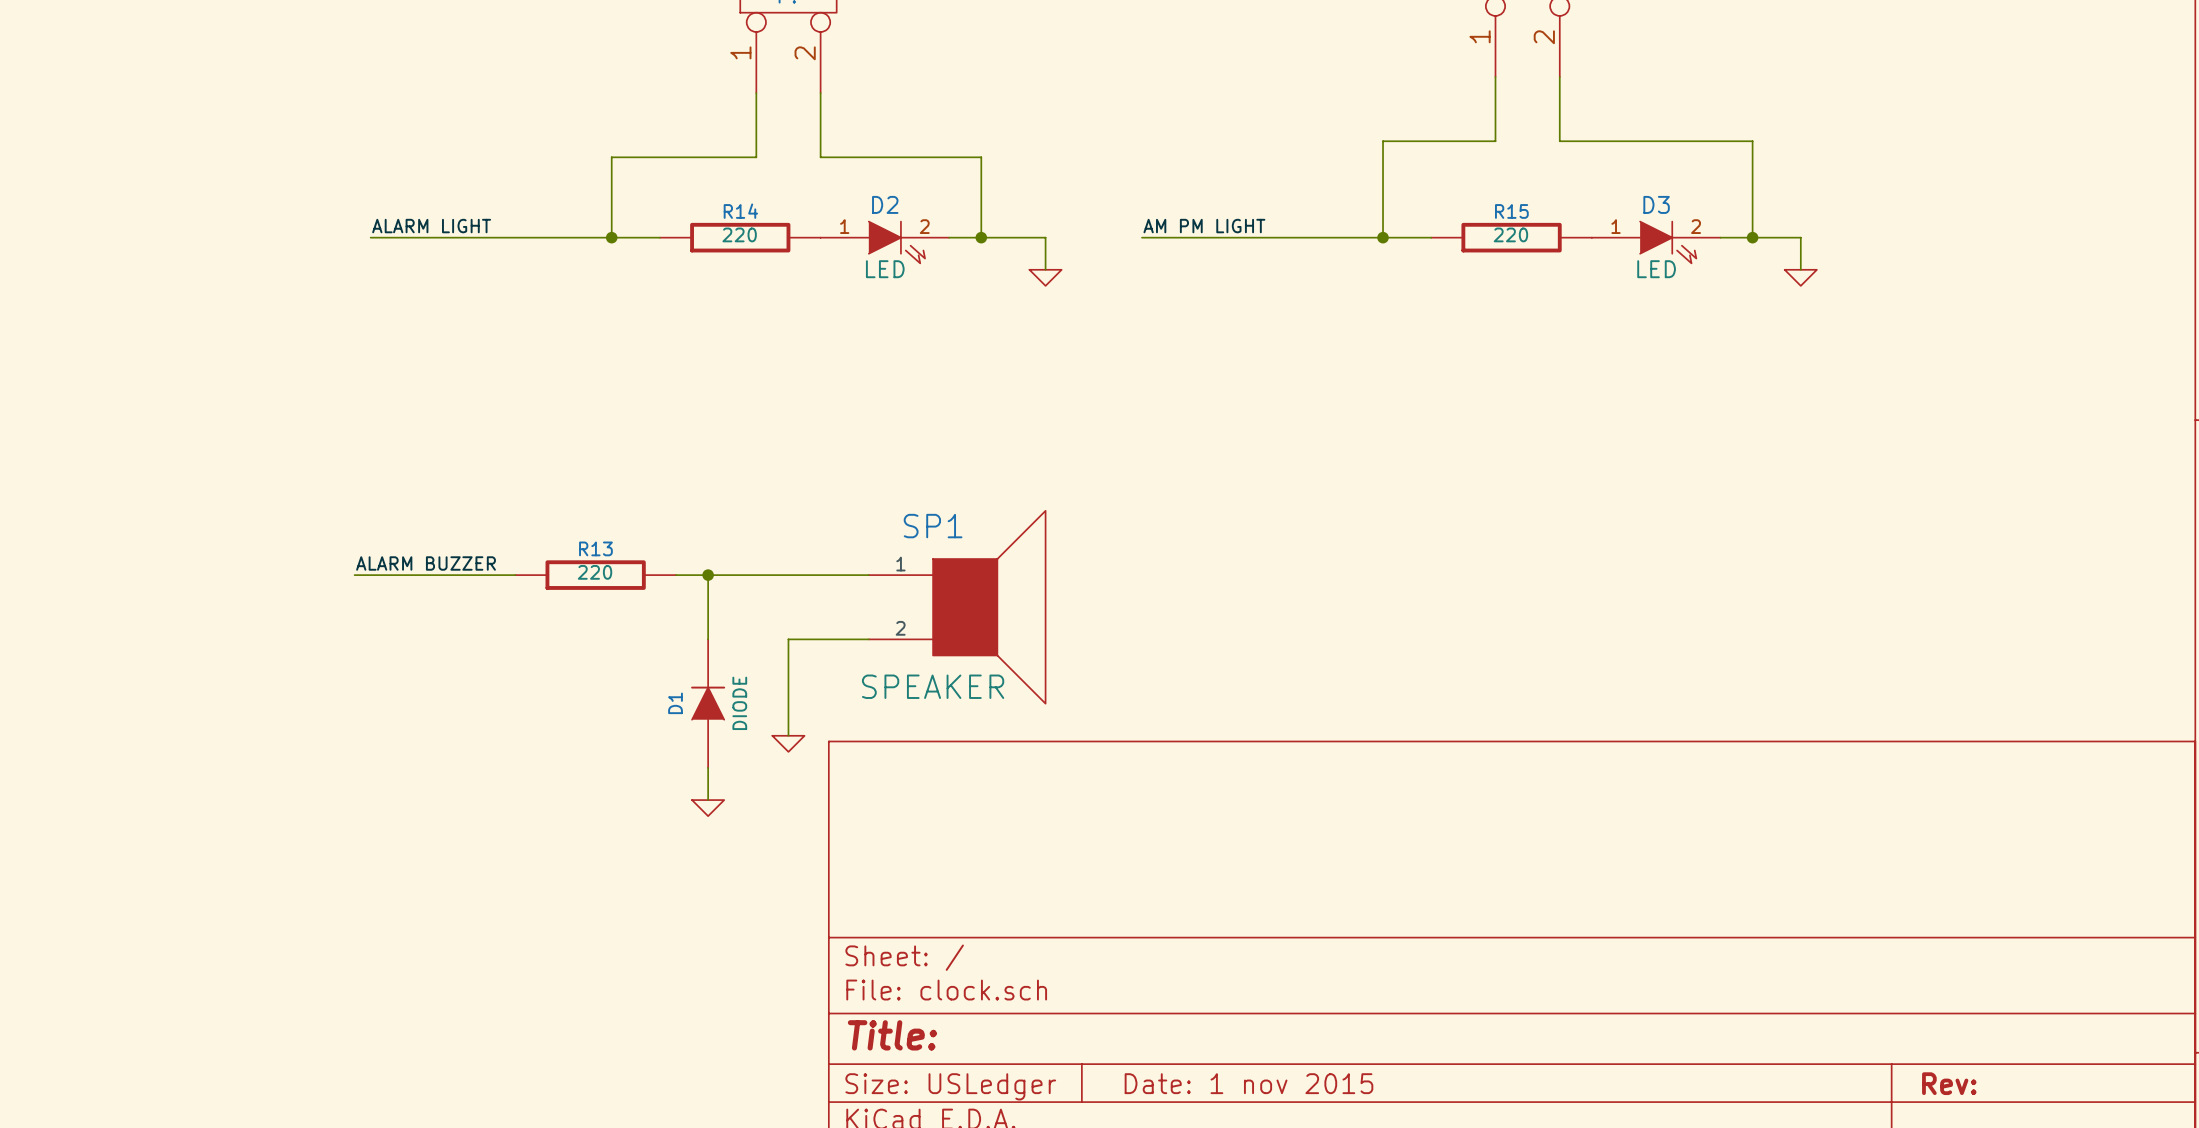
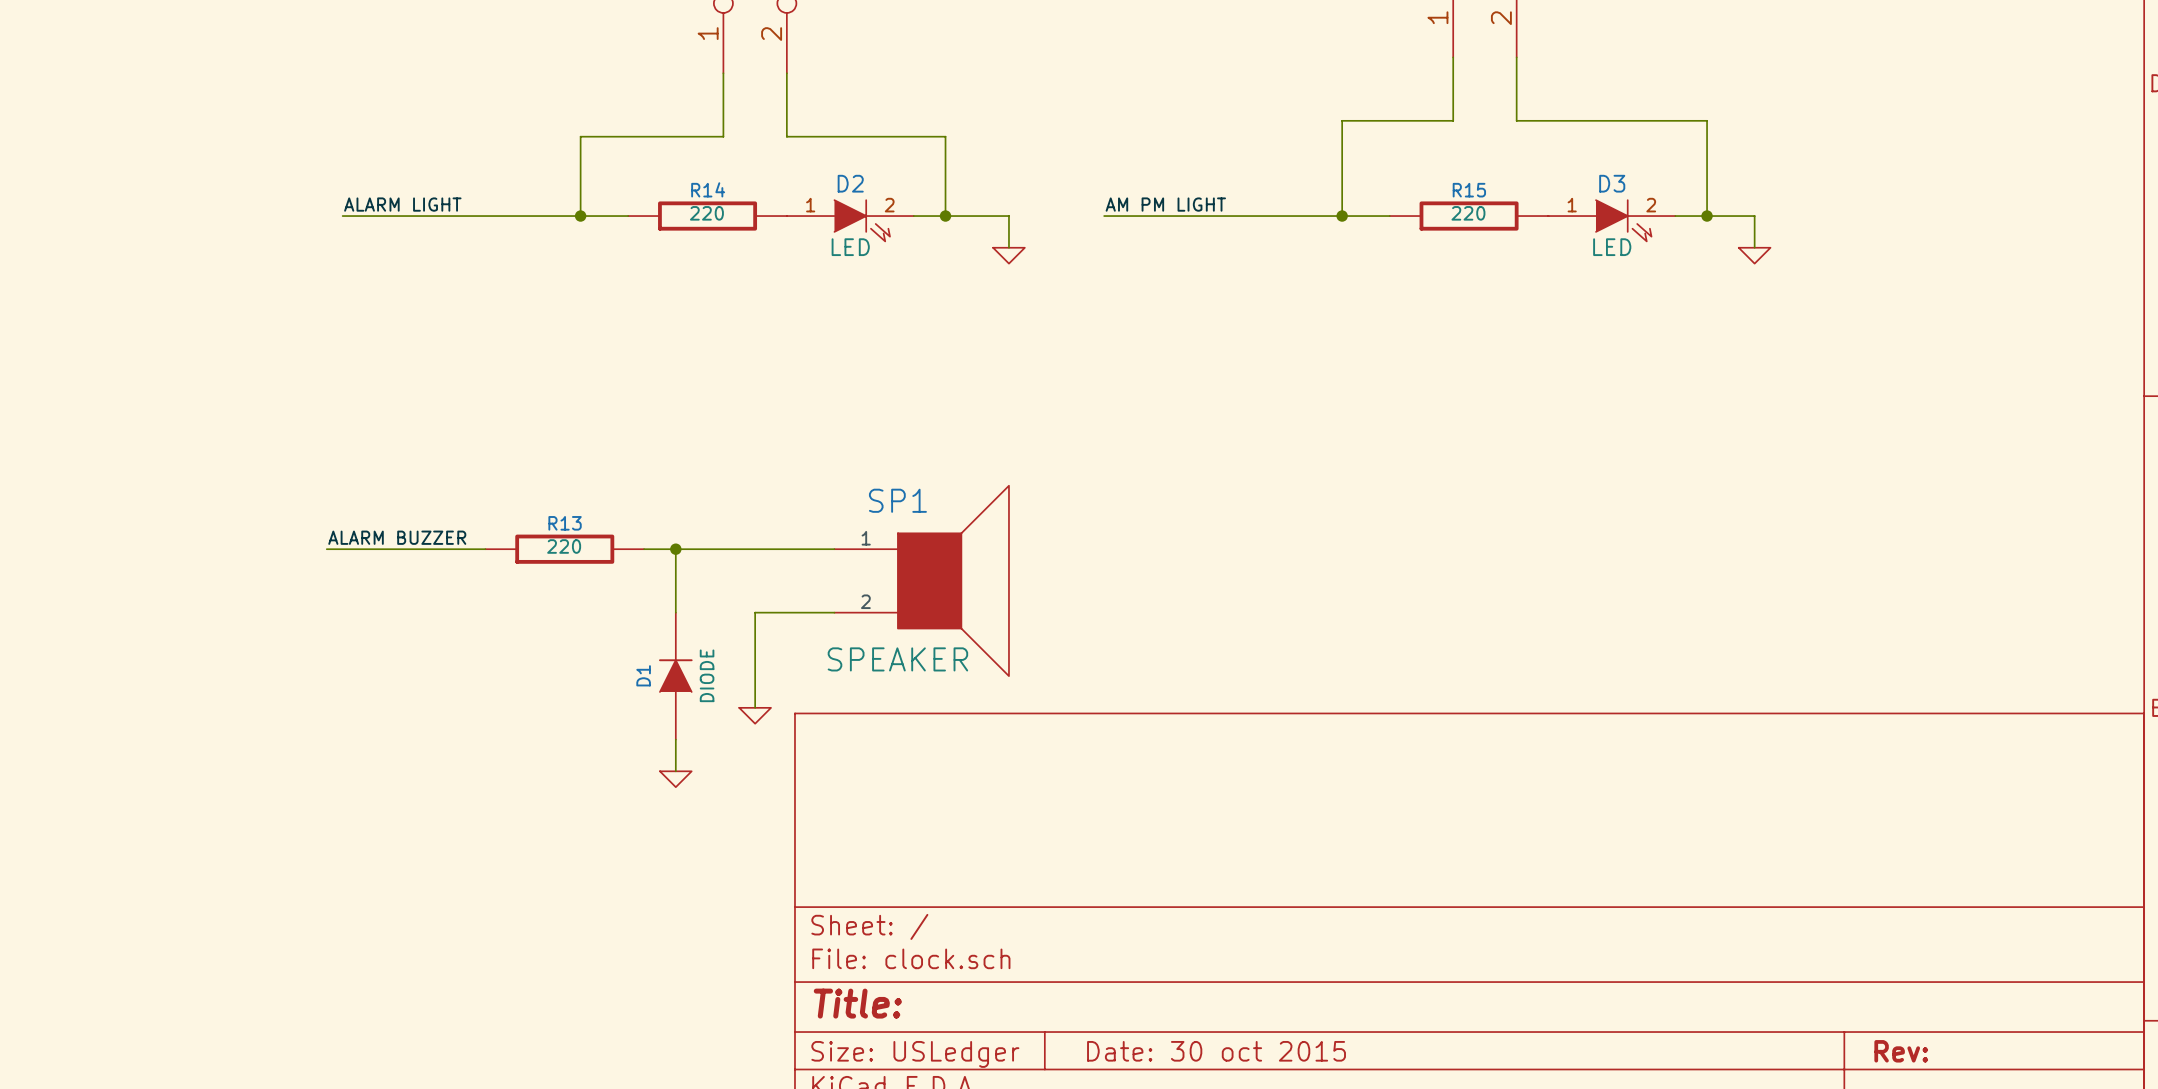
title block: Date: 1 nov 2015 (1248, 1083) -> Date: 30 oct 2015 (1216, 1051)

